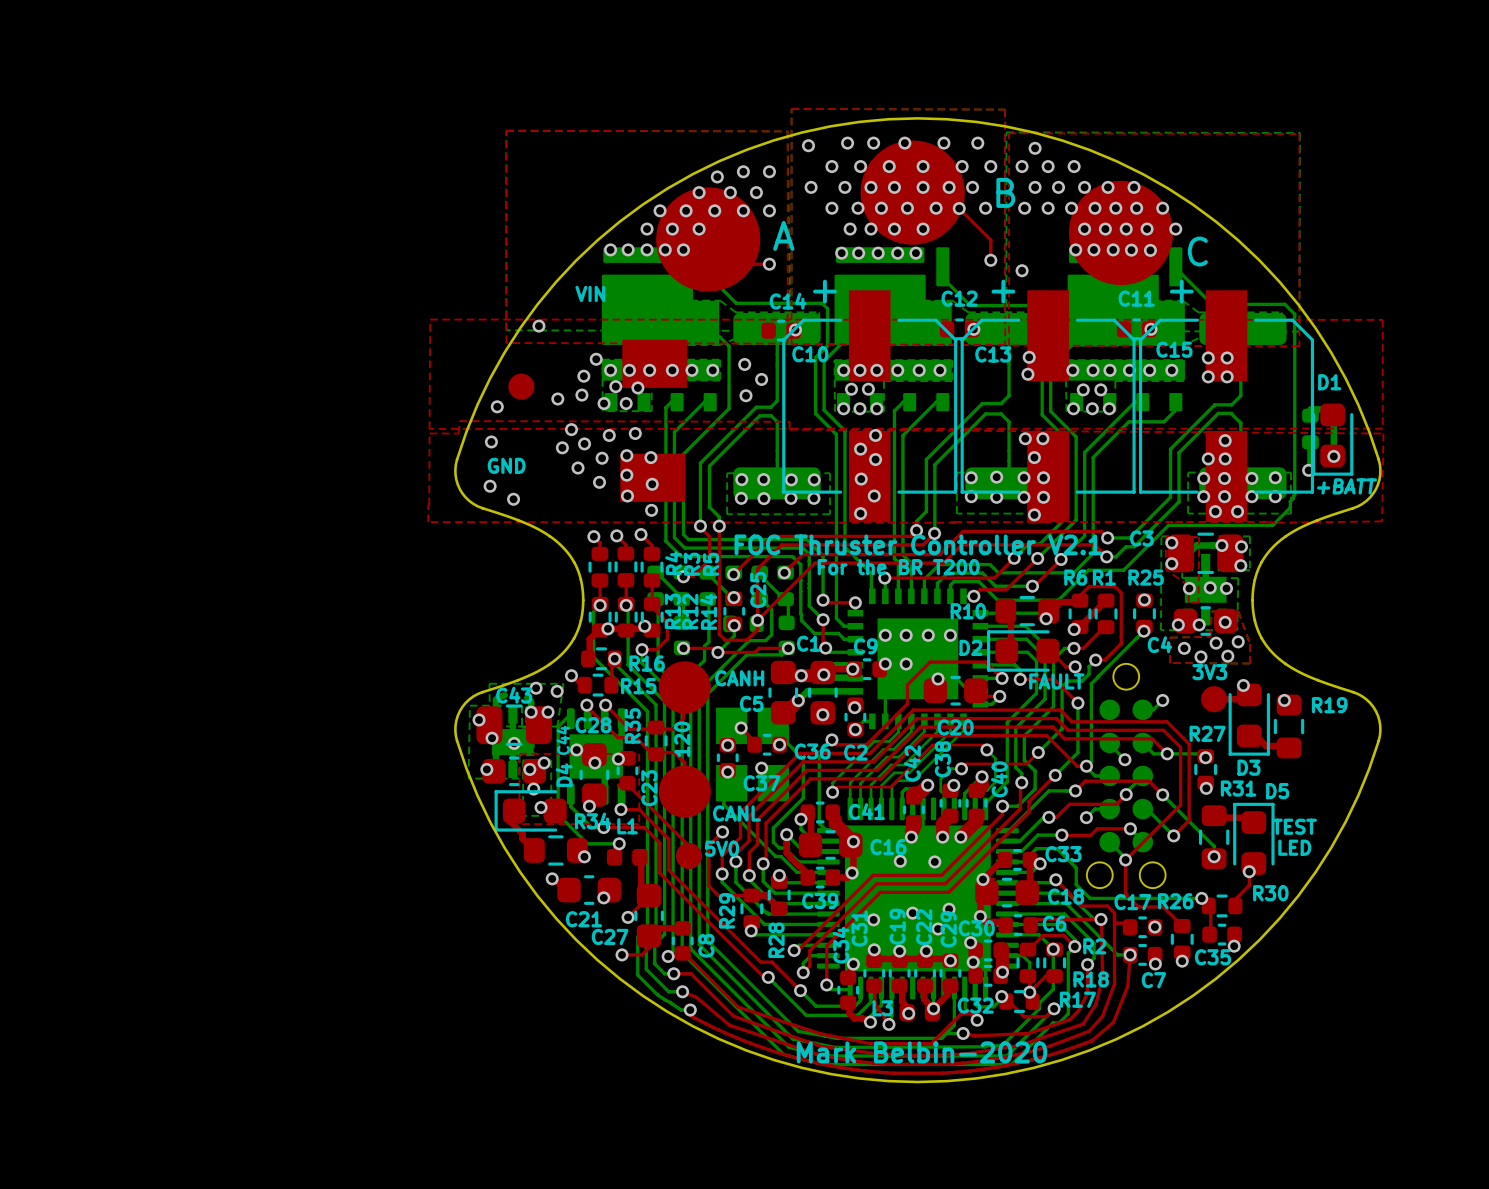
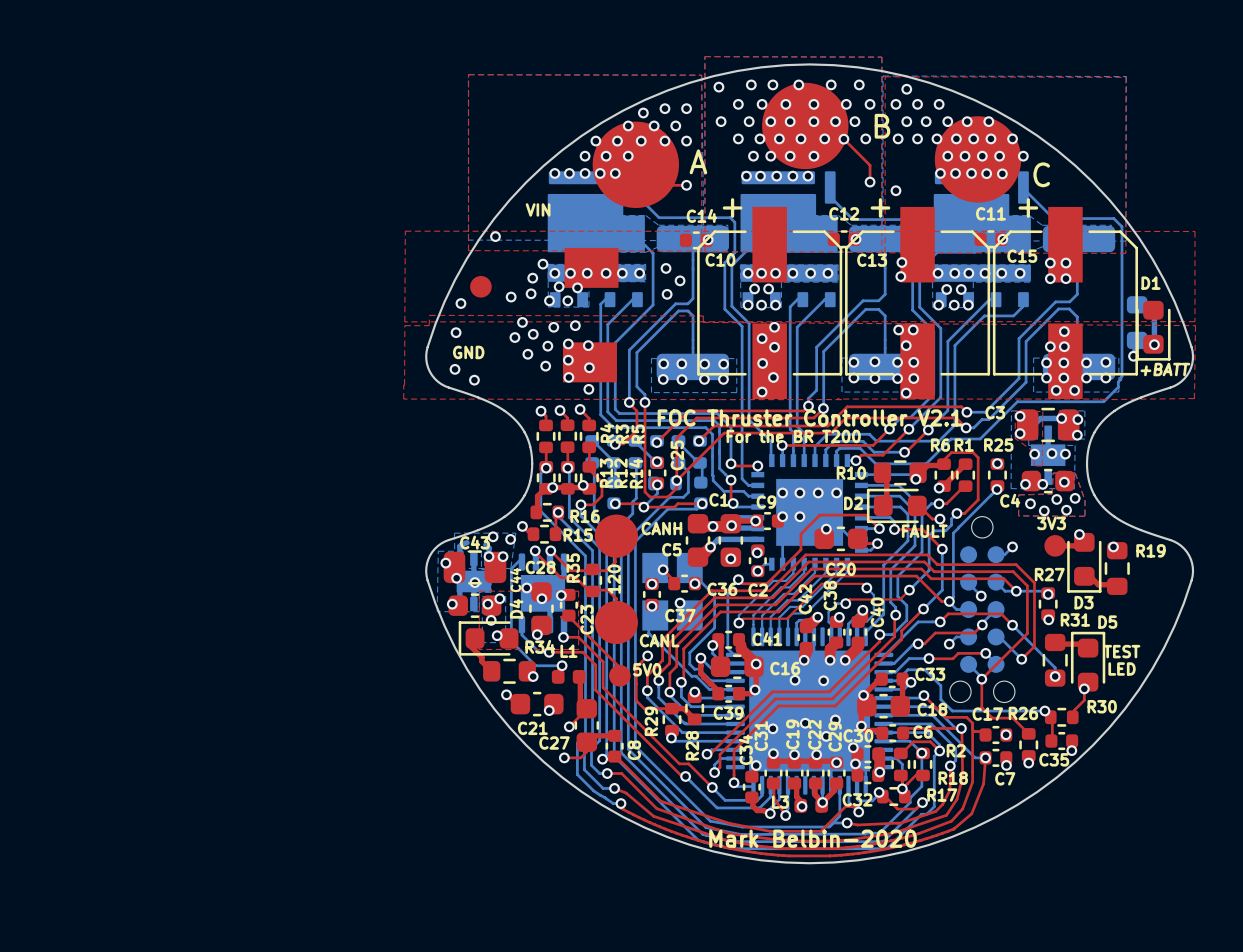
part footprint: [1302, 408, 1319, 450] -> [1126, 296, 1148, 350]

